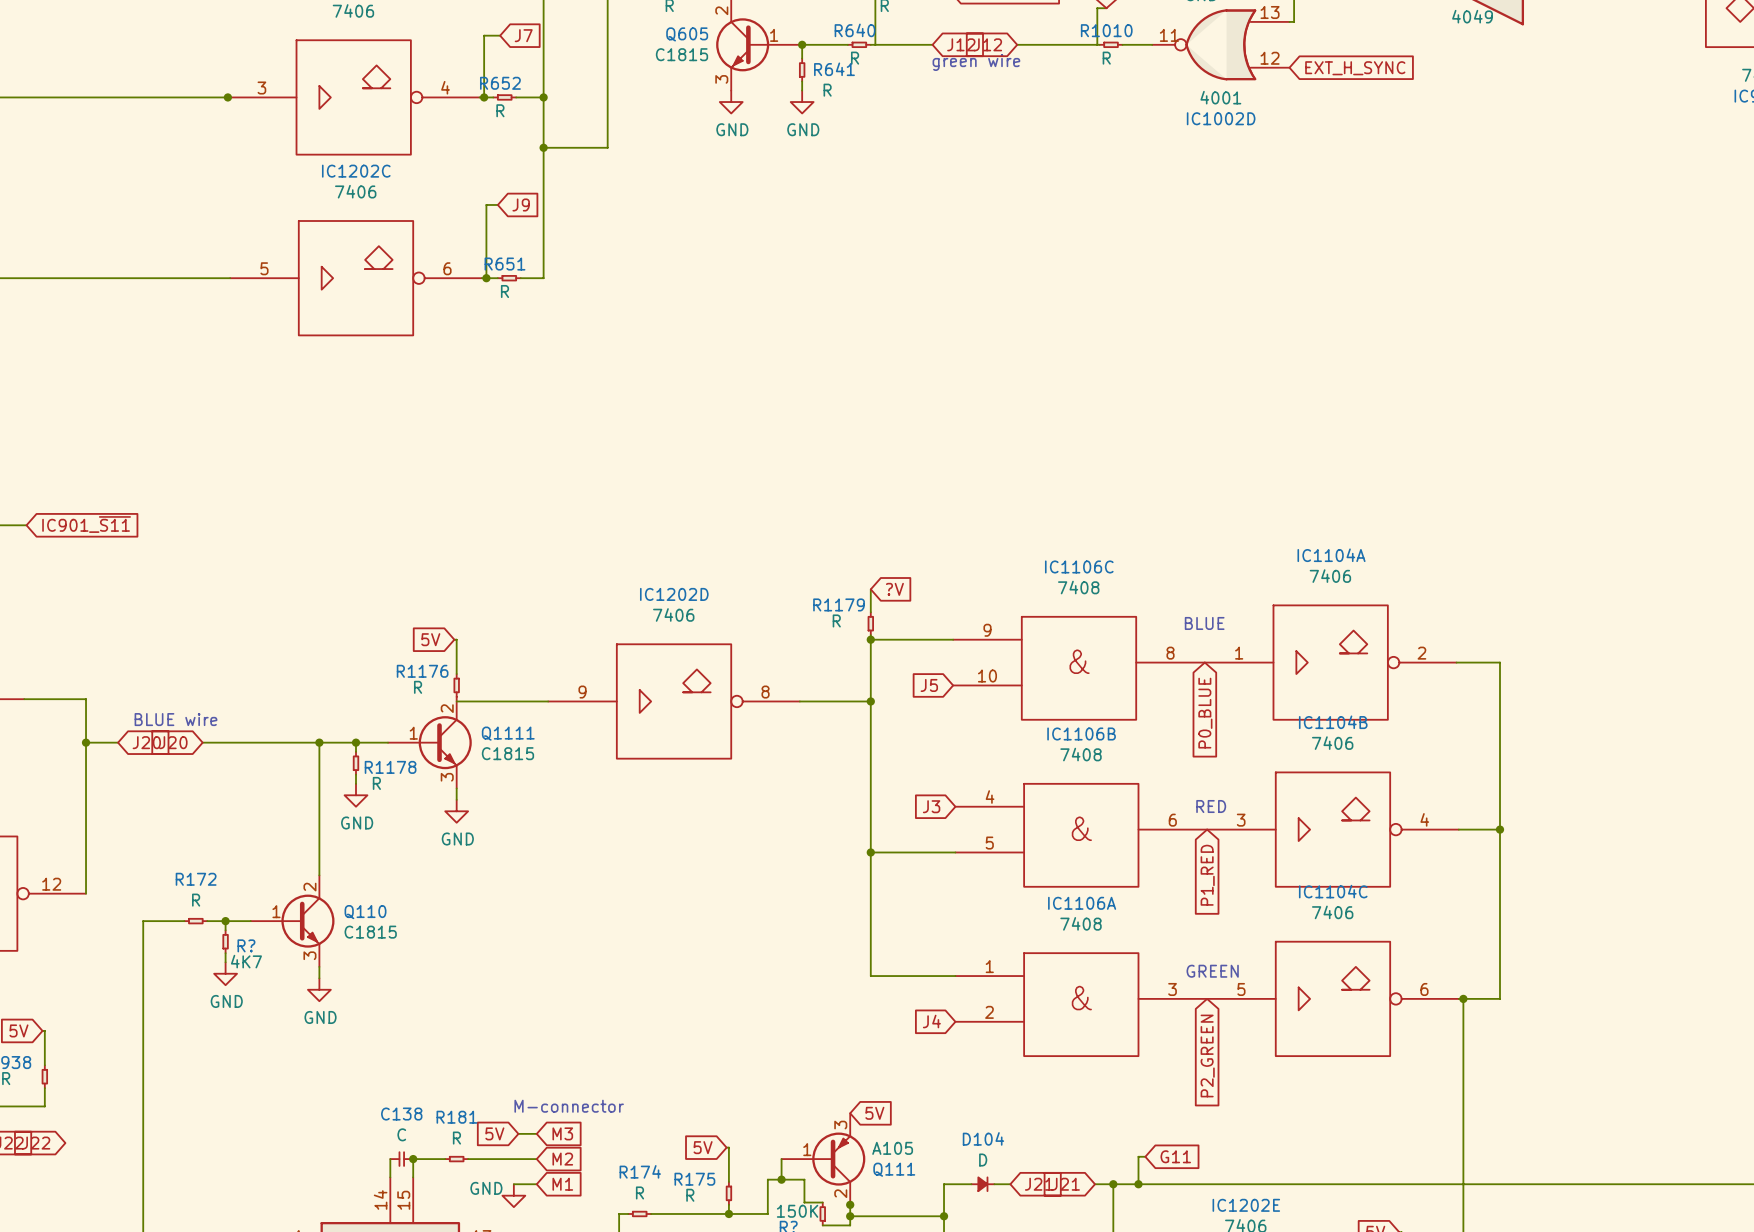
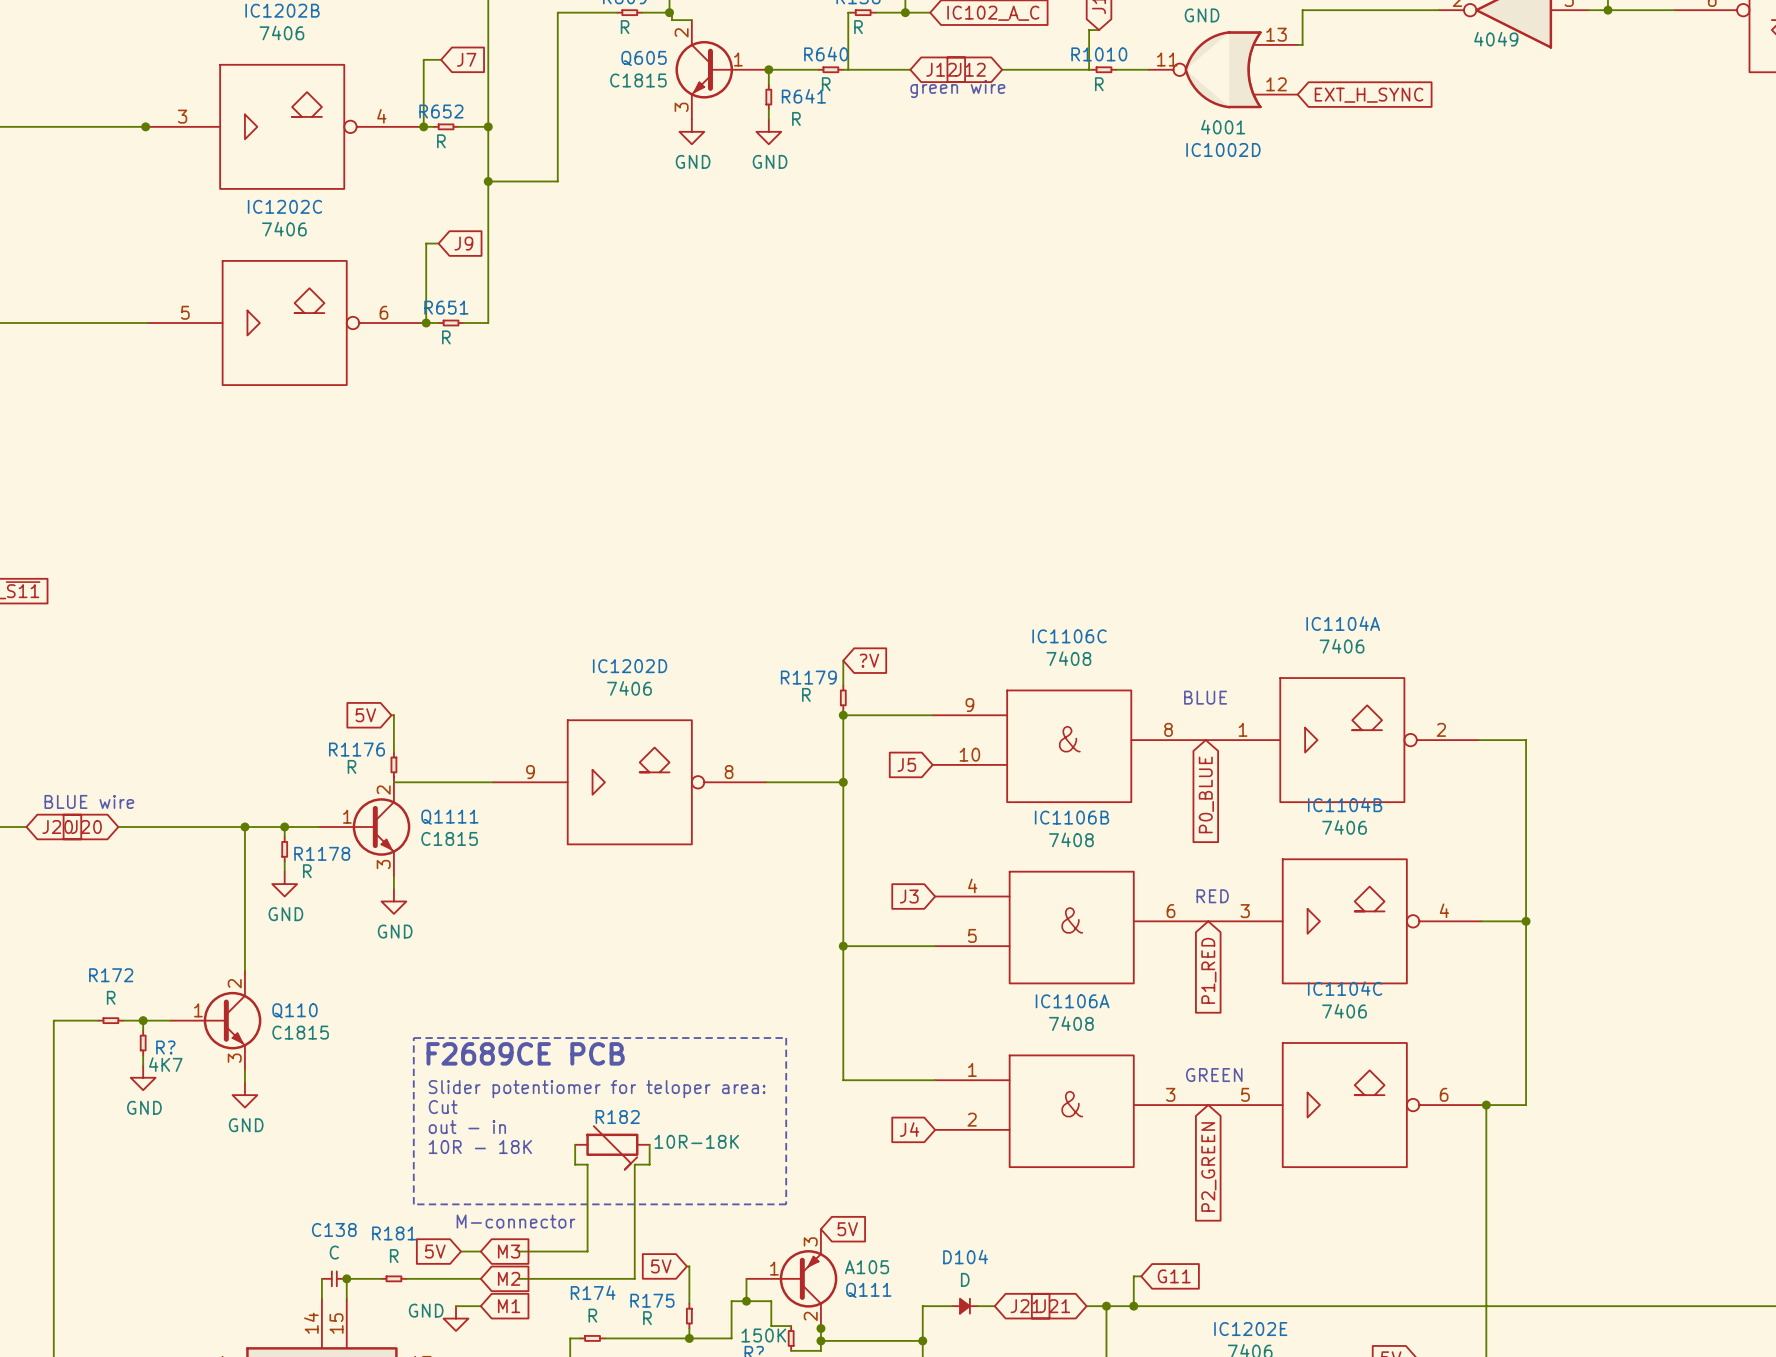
line: none -> (413, 1038) (413, 1204) (786, 1204) (786, 1038) (413, 1038)
text: none -> F2689CE PCB (525, 1053)
text: none -> Slider potentiomer for teloper area: (597, 1089)
text: none -> Cut (443, 1107)
text: none -> out - in (467, 1127)
wire: none -> (575, 1144) (575, 1164) (587, 1164) (587, 1251) (518, 1251)
wire: none -> (649, 1144) (649, 1164) (634, 1164) (634, 1278) (518, 1278)
text: none -> 10R - 18K (480, 1147)
R182: none -> 10R-18K (612, 1147)

